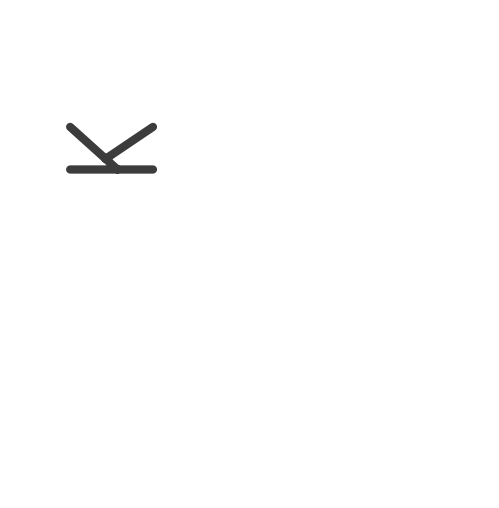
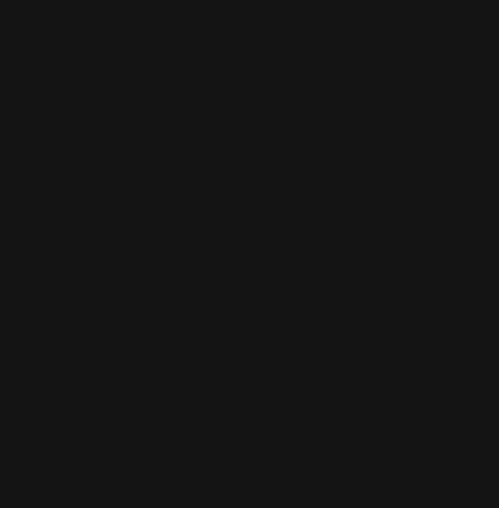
text: K (111, 148) -> none

